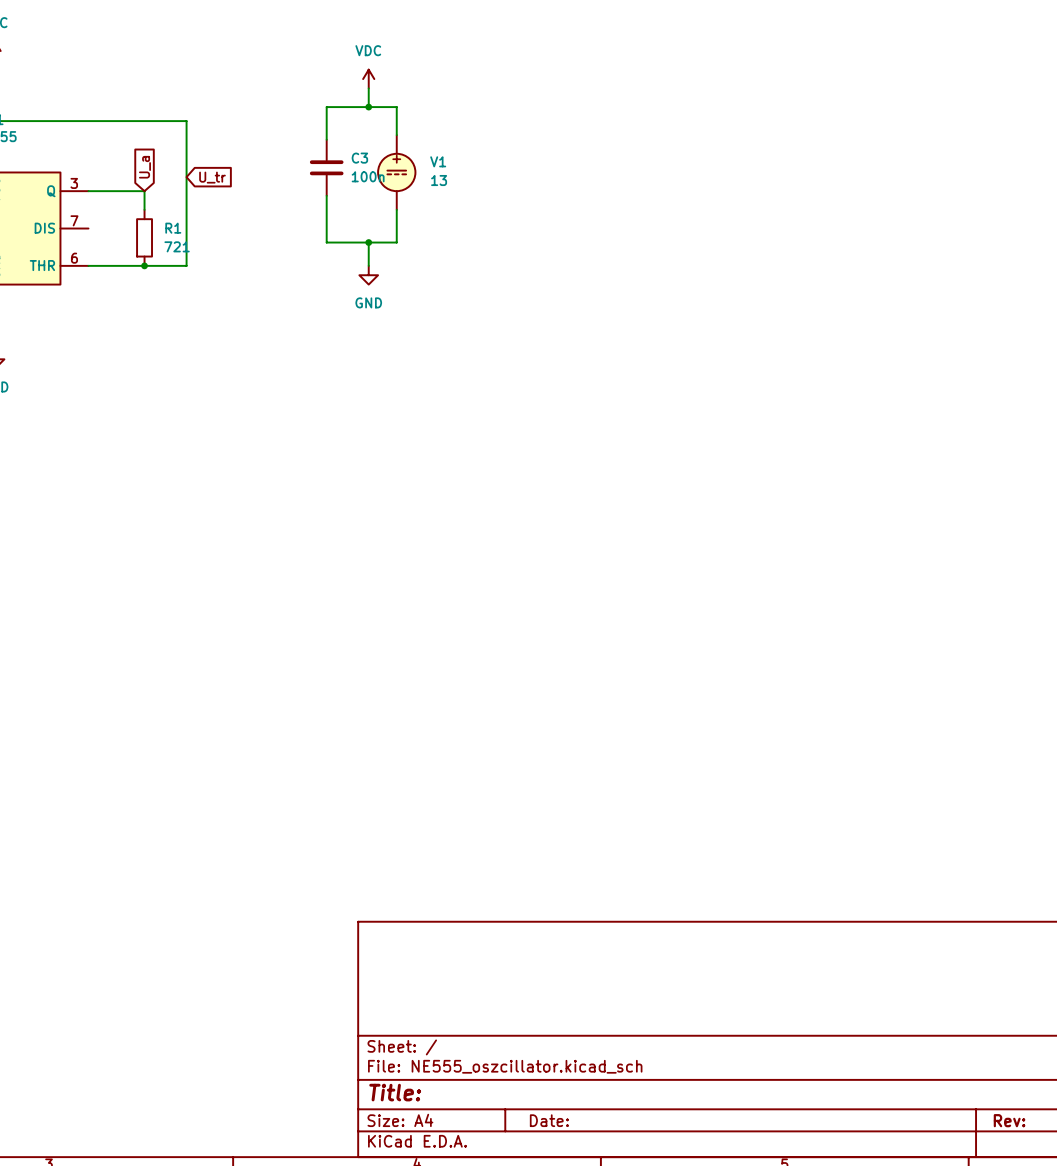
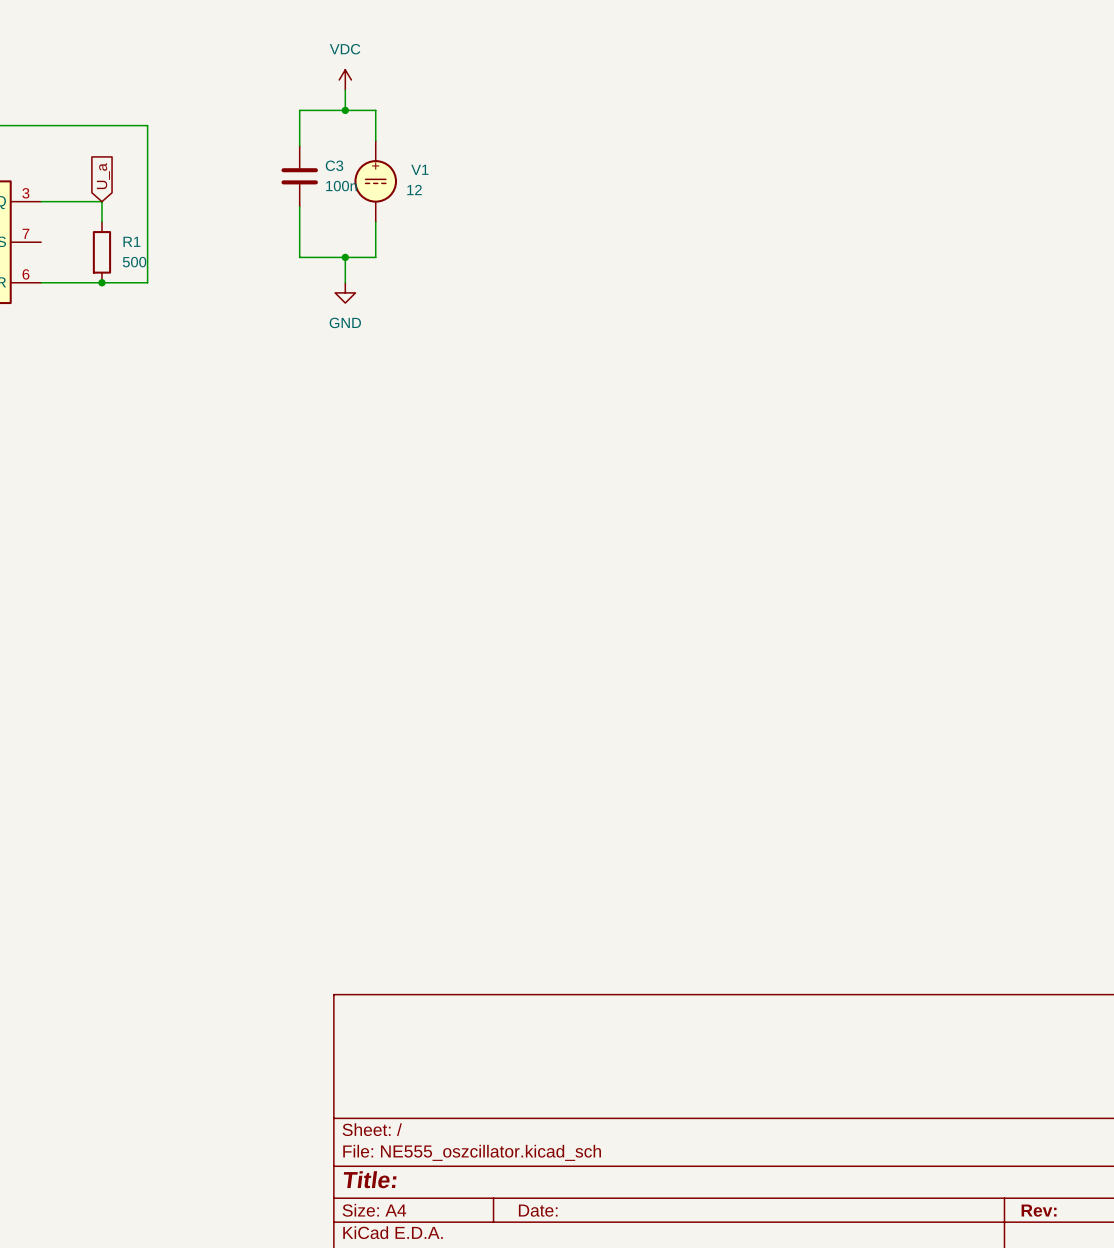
global label: U_tr (212, 177) -> none
V1 value: 13 (439, 180) -> 12 (414, 190)
R1 value: 721 (177, 246) -> 500 (134, 262)

